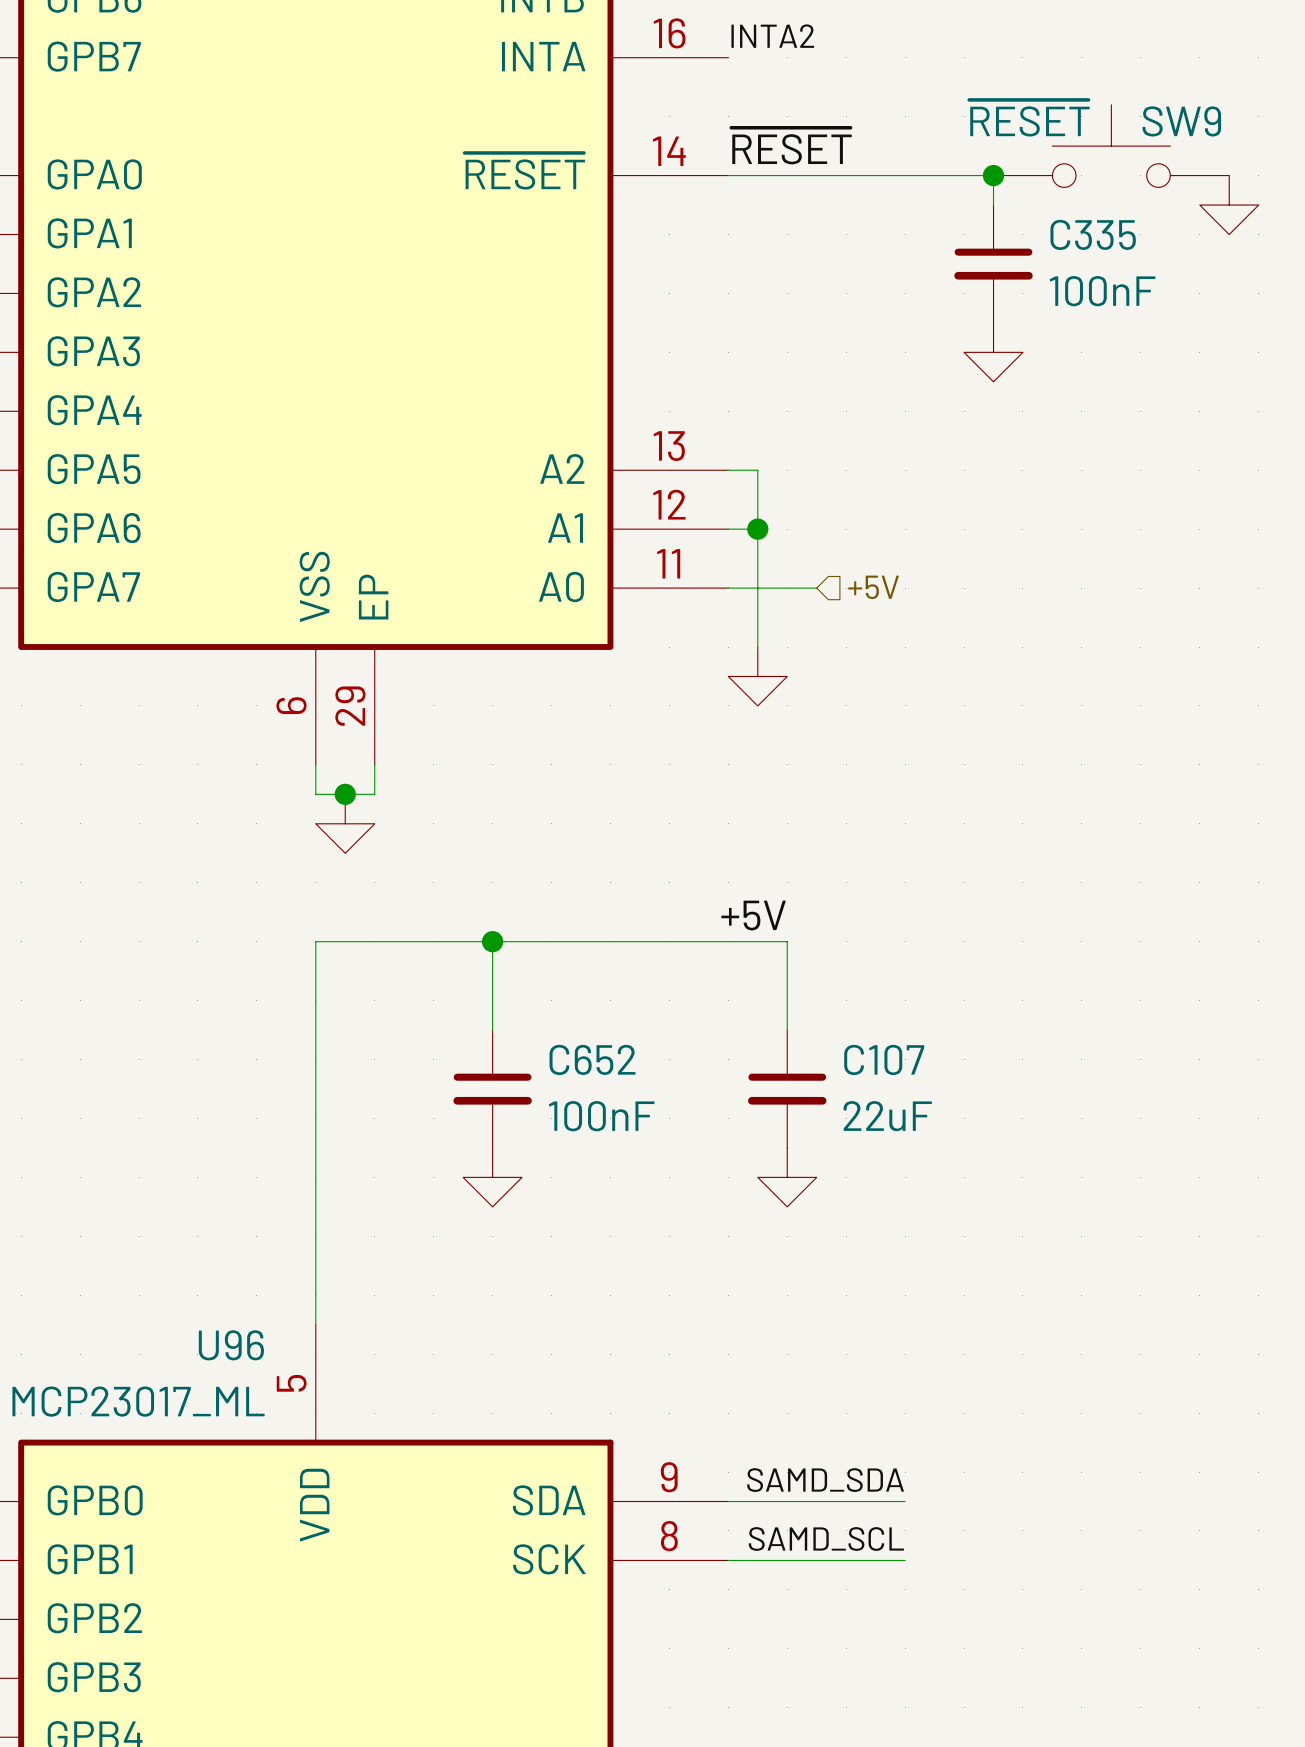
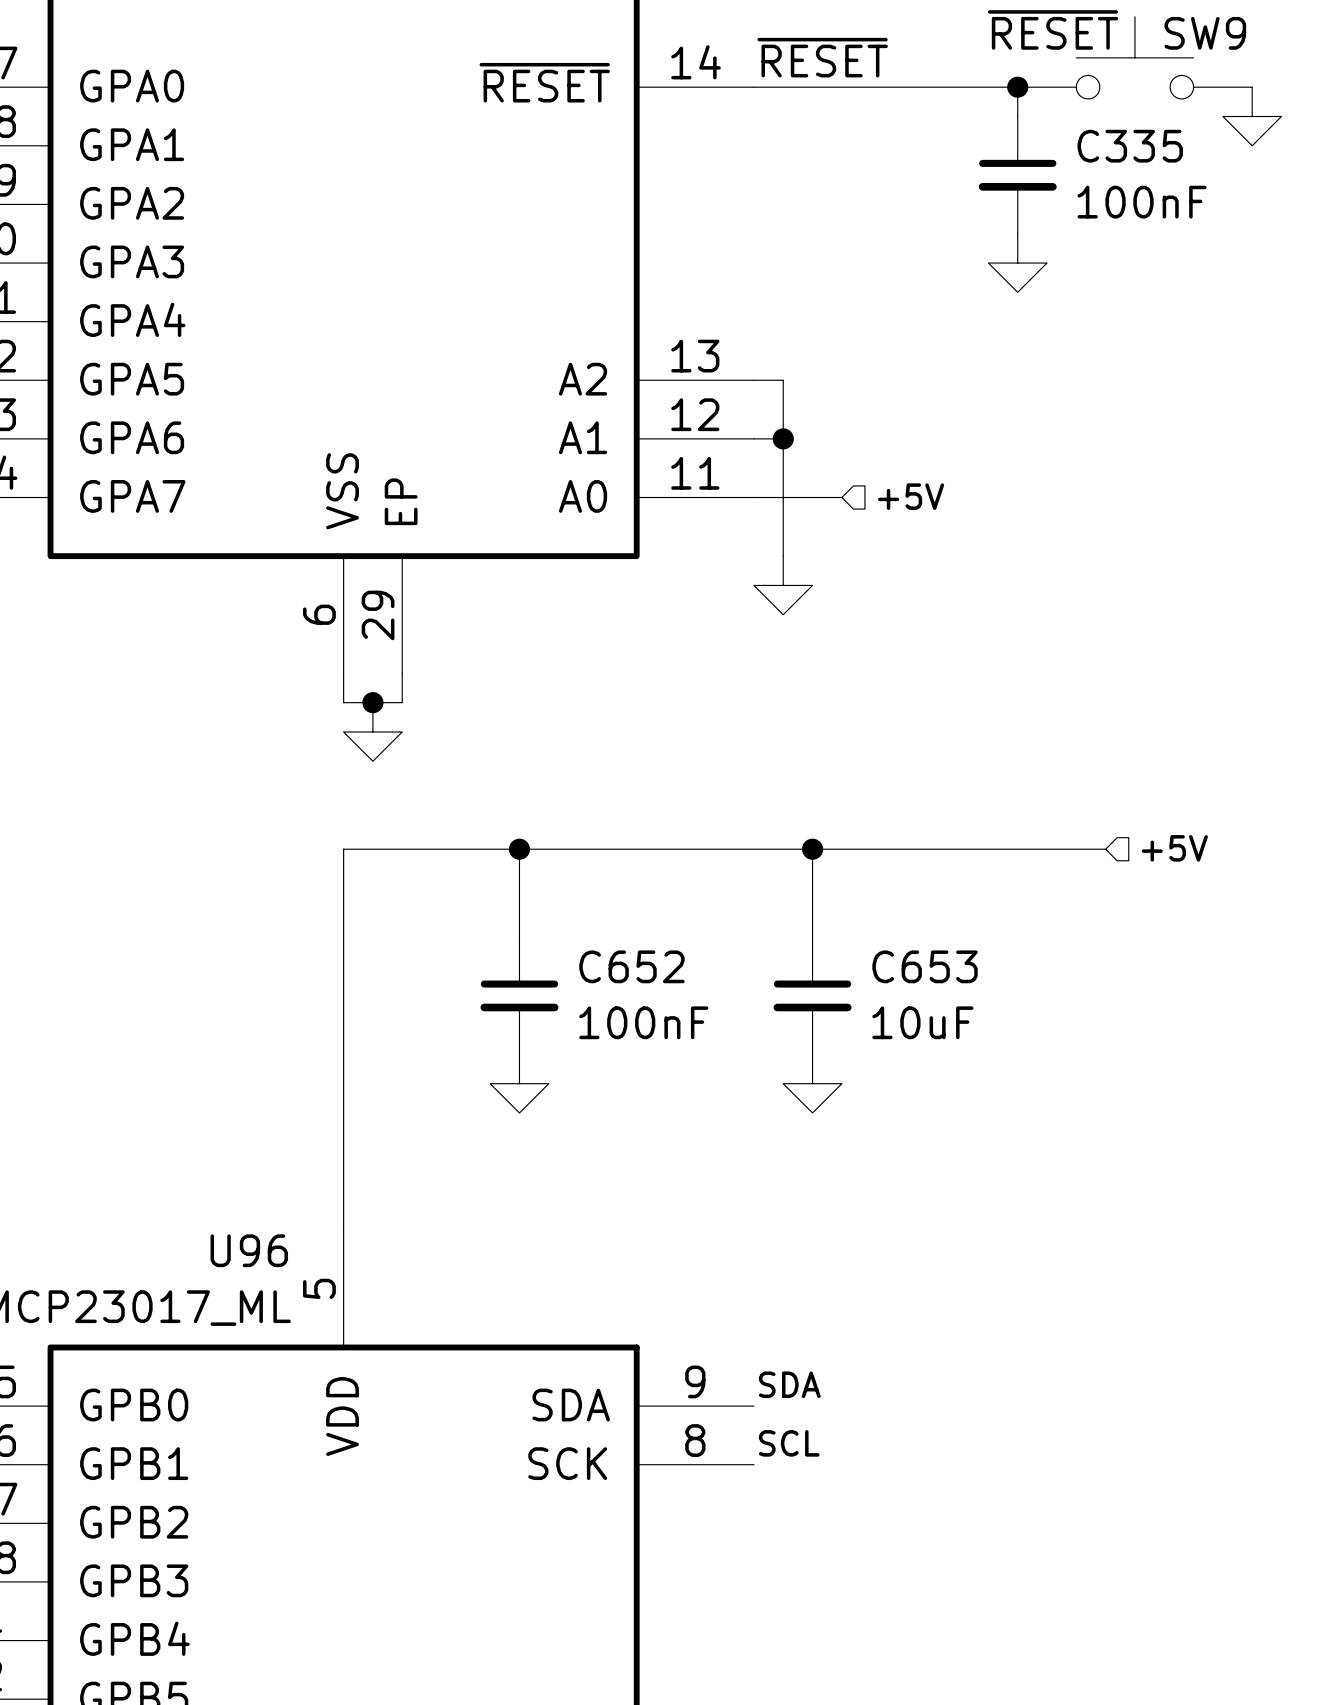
label: +5V (753, 915) -> none
hierarchical label: none -> +5V (1174, 848)
wire: none -> (812, 849) (1105, 849)
junction: none -> (812, 849)
C107 name: C107 (884, 1059) -> C653 (925, 966)
C107 value: 22uF (887, 1116) -> 10uF (922, 1022)
label: none -> SDA (789, 1384)
label: SAMD_SDA (825, 1480) -> none
wire: (728, 1501) (905, 1501) -> none
label: none -> SCL (789, 1443)
label: SAMD_SCL (826, 1539) -> none
wire: (728, 1560) (905, 1560) -> none

